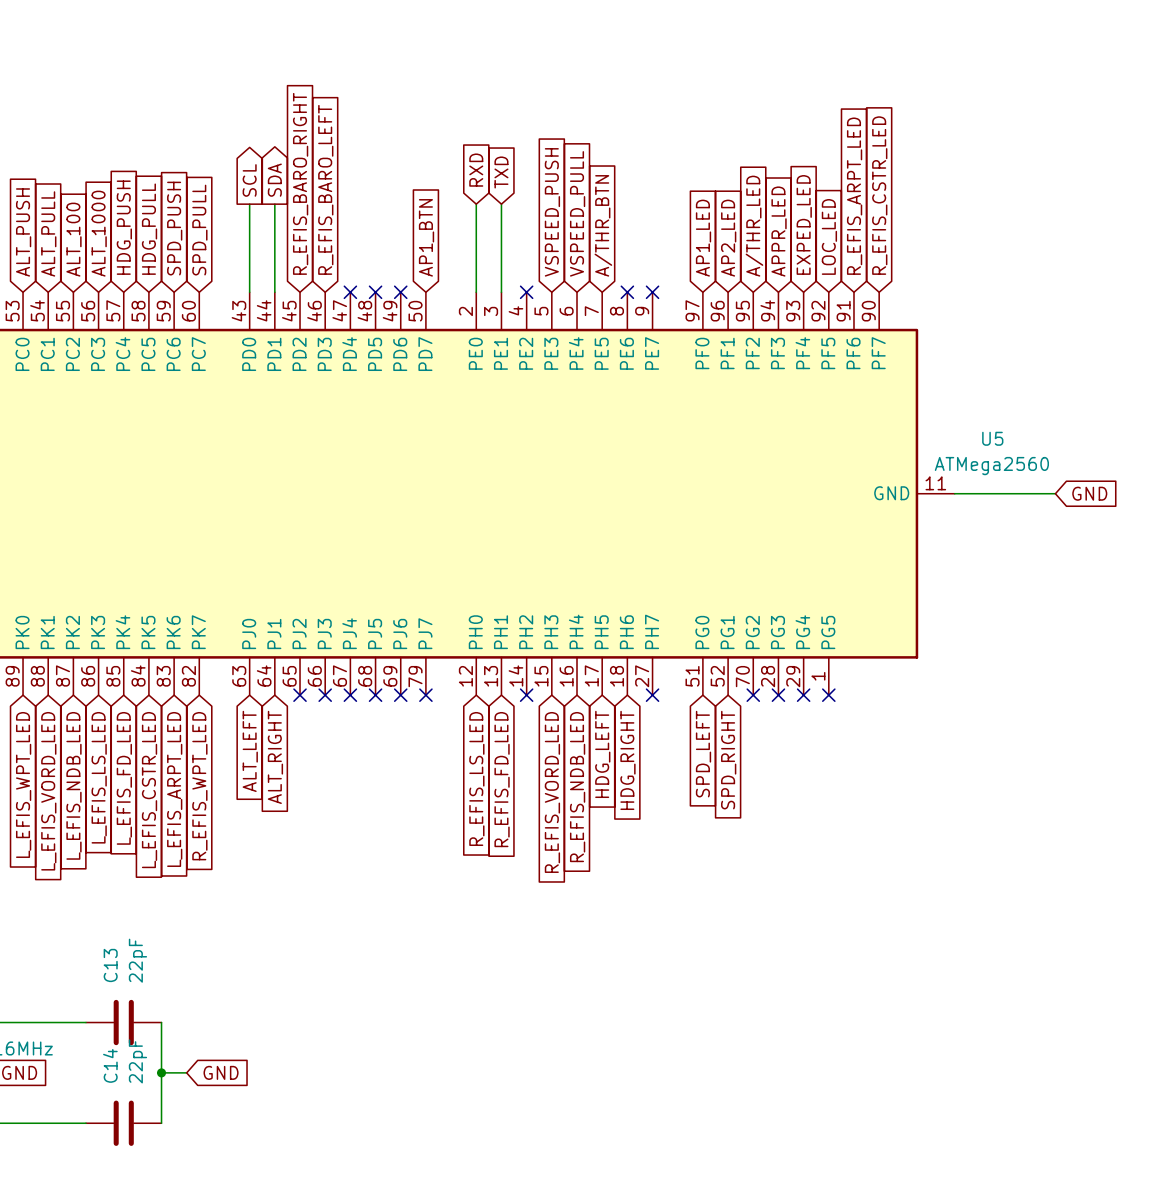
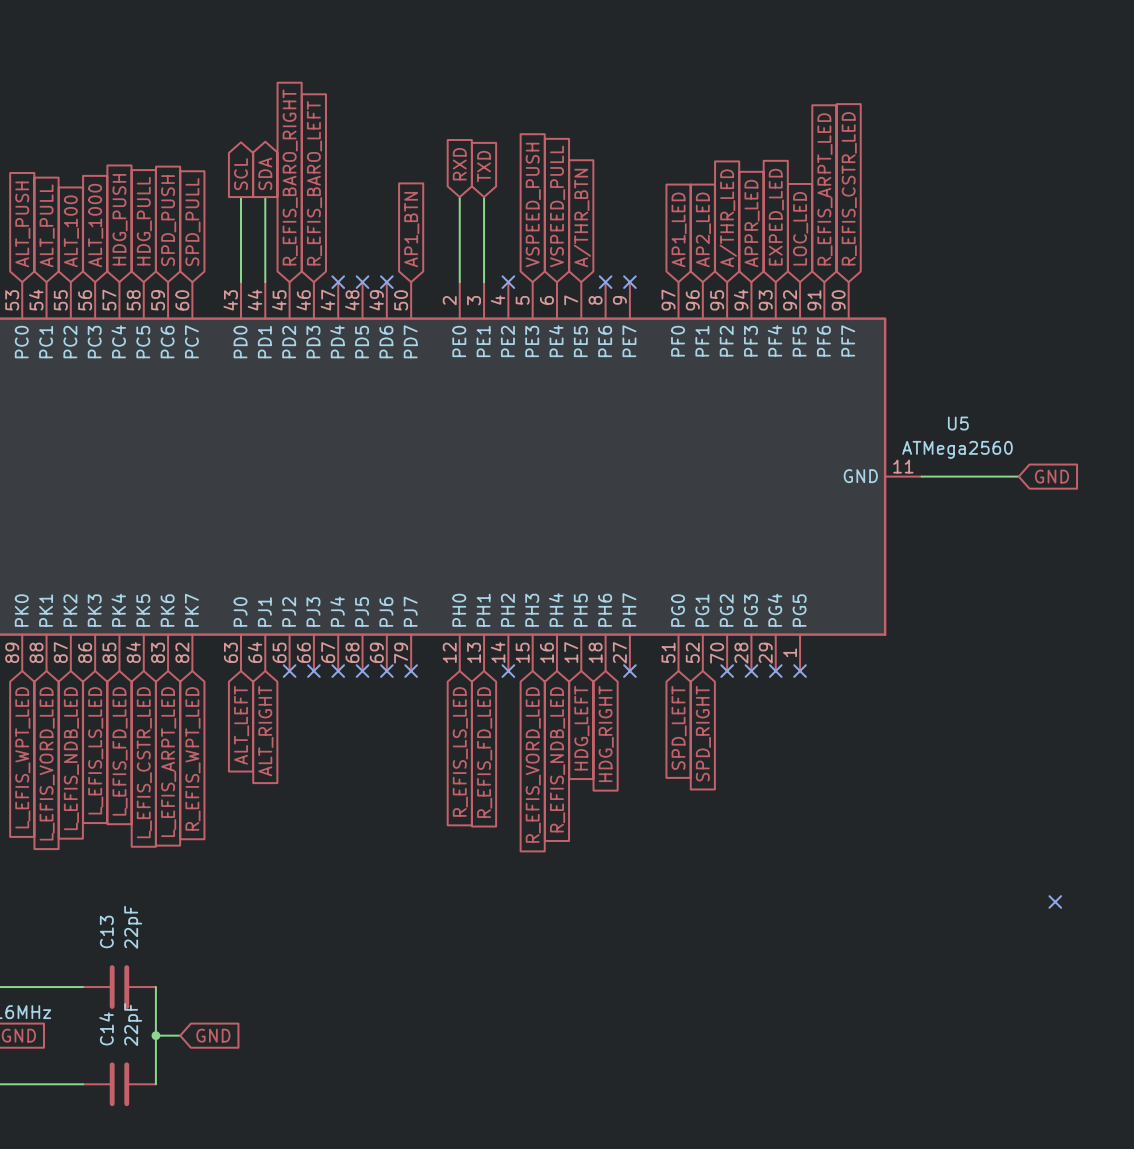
no-connect mark: none -> (1055, 901)

